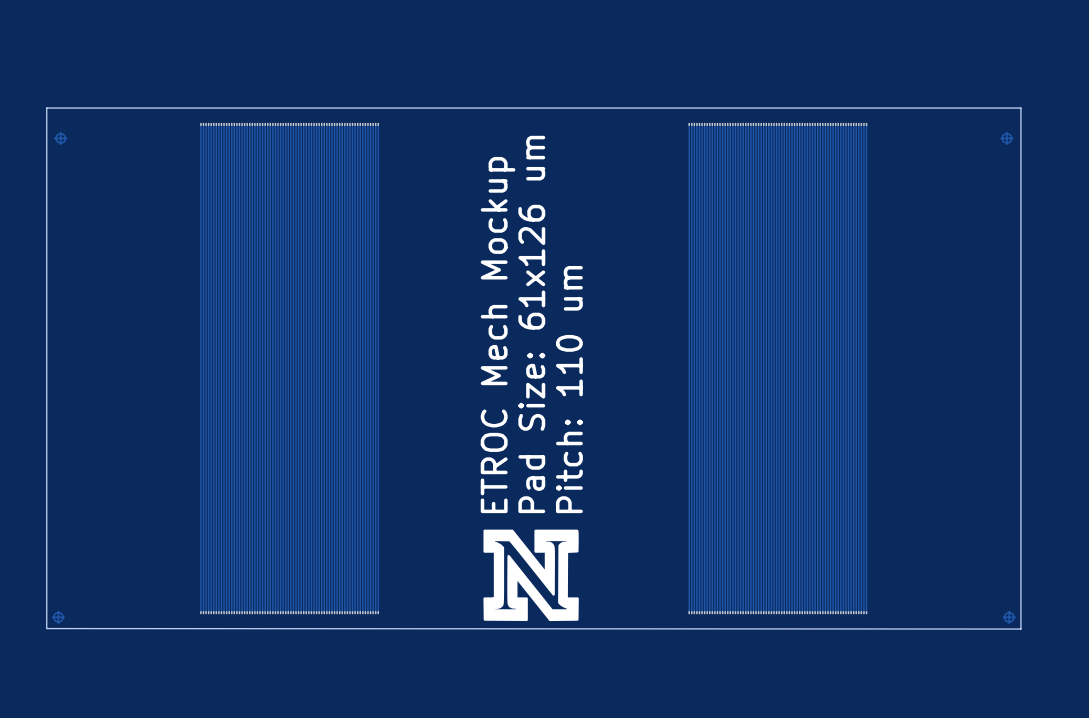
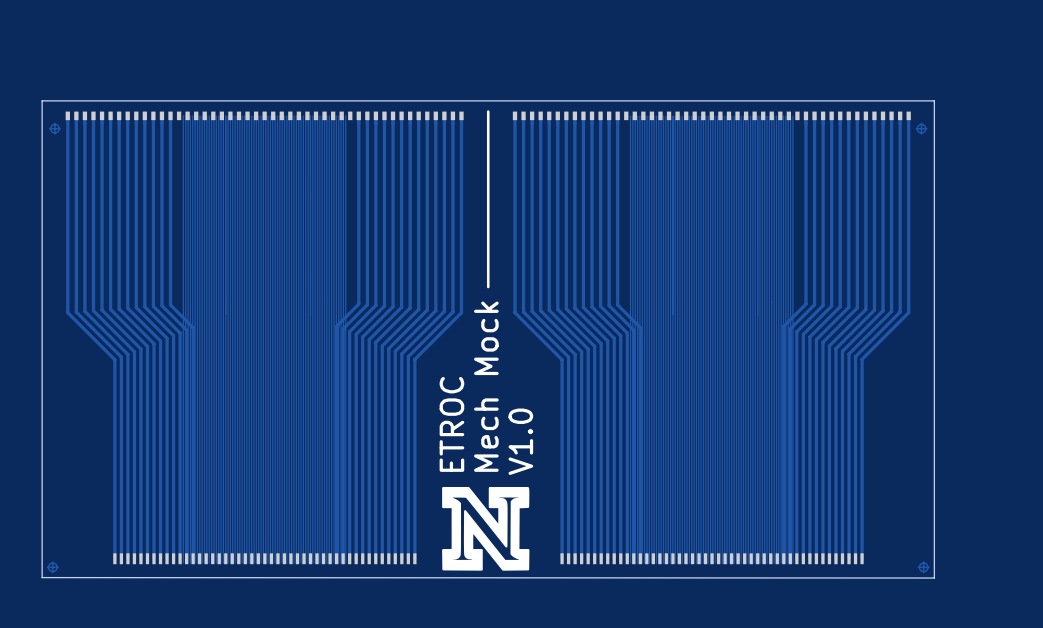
line: none -> (488, 111) (488, 287)
part footprint: [200, 122, 379, 126] -> [65, 111, 464, 121]
track: none -> (384, 113) (384, 306) (356, 334) (356, 558)
track: none -> (401, 113) (401, 307) (369, 339) (369, 558)
part footprint: [688, 122, 868, 126] -> [512, 111, 911, 121]
track: none -> (831, 113) (831, 306) (803, 334) (803, 558)
track: none -> (848, 113) (848, 307) (816, 339) (816, 558)
track: none -> (67, 115) (67, 312) (114, 359) (114, 558)
track: none -> (76, 115) (76, 312) (121, 357) (121, 558)
track: none -> (84, 115) (84, 311) (127, 354) (127, 558)
track: none -> (93, 115) (93, 310) (134, 351) (134, 558)
track: none -> (102, 115) (102, 310) (140, 349) (140, 558)
track: none -> (110, 115) (110, 309) (147, 346) (147, 558)
track: none -> (119, 115) (119, 308) (154, 343) (154, 558)
track: none -> (127, 115) (127, 308) (160, 341) (160, 558)
track: none -> (136, 115) (136, 307) (167, 338) (167, 558)
track: none -> (144, 115) (144, 306) (173, 335) (173, 558)
track: none -> (153, 115) (153, 306) (180, 333) (180, 558)
track: none -> (161, 115) (161, 305) (186, 330) (186, 558)
track: none -> (170, 115) (170, 305) (193, 327) (193, 558)
track: none -> (358, 115) (358, 304) (336, 326) (336, 558)
track: none -> (367, 115) (367, 304) (343, 329) (343, 558)
track: none -> (375, 115) (375, 305) (349, 331) (349, 558)
track: none -> (393, 115) (393, 306) (362, 337) (362, 558)
track: none -> (410, 115) (410, 307) (375, 342) (375, 558)
track: none -> (427, 115) (427, 310) (388, 348) (388, 558)
track: none -> (435, 115) (435, 310) (395, 351) (395, 558)
track: none -> (444, 115) (444, 311) (401, 353) (401, 558)
track: none -> (452, 115) (452, 312) (408, 356) (408, 558)
track: none -> (461, 115) (461, 312) (414, 359) (414, 558)
track: none -> (523, 115) (523, 312) (568, 357) (568, 558)
track: none -> (532, 115) (532, 311) (575, 354) (575, 558)
track: none -> (540, 115) (540, 310) (581, 351) (581, 558)
track: none -> (549, 115) (549, 310) (588, 349) (588, 558)
track: none -> (557, 115) (557, 309) (594, 346) (594, 558)
track: none -> (566, 115) (566, 308) (601, 343) (601, 558)
track: none -> (574, 115) (574, 308) (607, 341) (607, 558)
track: none -> (583, 115) (583, 307) (614, 338) (614, 558)
track: none -> (592, 115) (592, 306) (620, 335) (620, 558)
track: none -> (600, 115) (600, 306) (627, 333) (627, 558)
track: none -> (609, 115) (609, 305) (633, 330) (633, 558)
track: none -> (617, 115) (617, 305) (640, 327) (640, 558)
track: none -> (805, 115) (805, 304) (783, 326) (783, 558)
track: none -> (814, 115) (814, 304) (790, 329) (790, 558)
track: none -> (823, 115) (823, 305) (796, 331) (796, 558)
track: none -> (840, 115) (840, 306) (809, 337) (809, 558)
track: none -> (857, 115) (857, 307) (822, 342) (822, 558)
track: none -> (874, 115) (874, 310) (835, 348) (835, 558)
track: none -> (883, 115) (883, 310) (842, 351) (842, 558)
track: none -> (891, 115) (891, 311) (849, 353) (849, 558)
track: none -> (900, 115) (900, 312) (855, 356) (855, 558)
track: none -> (908, 115) (908, 312) (862, 359) (862, 558)
track: none -> (418, 118) (418, 309) (382, 345) (382, 558)
track: none -> (865, 118) (865, 309) (829, 345) (829, 558)
track: none -> (514, 120) (514, 312) (562, 359) (562, 558)
text: Pad Size: 61x126 um (531, 324) -> Mech Mock (486, 386)
text: ETROC Mech Mockup (498, 335) -> ETROC (451, 424)
text: Pitch: 110 um (569, 389) -> V1.0 (520, 441)
part footprint: [200, 611, 379, 615] -> [113, 553, 417, 565]
part footprint: [688, 611, 868, 615] -> [560, 553, 864, 565]

